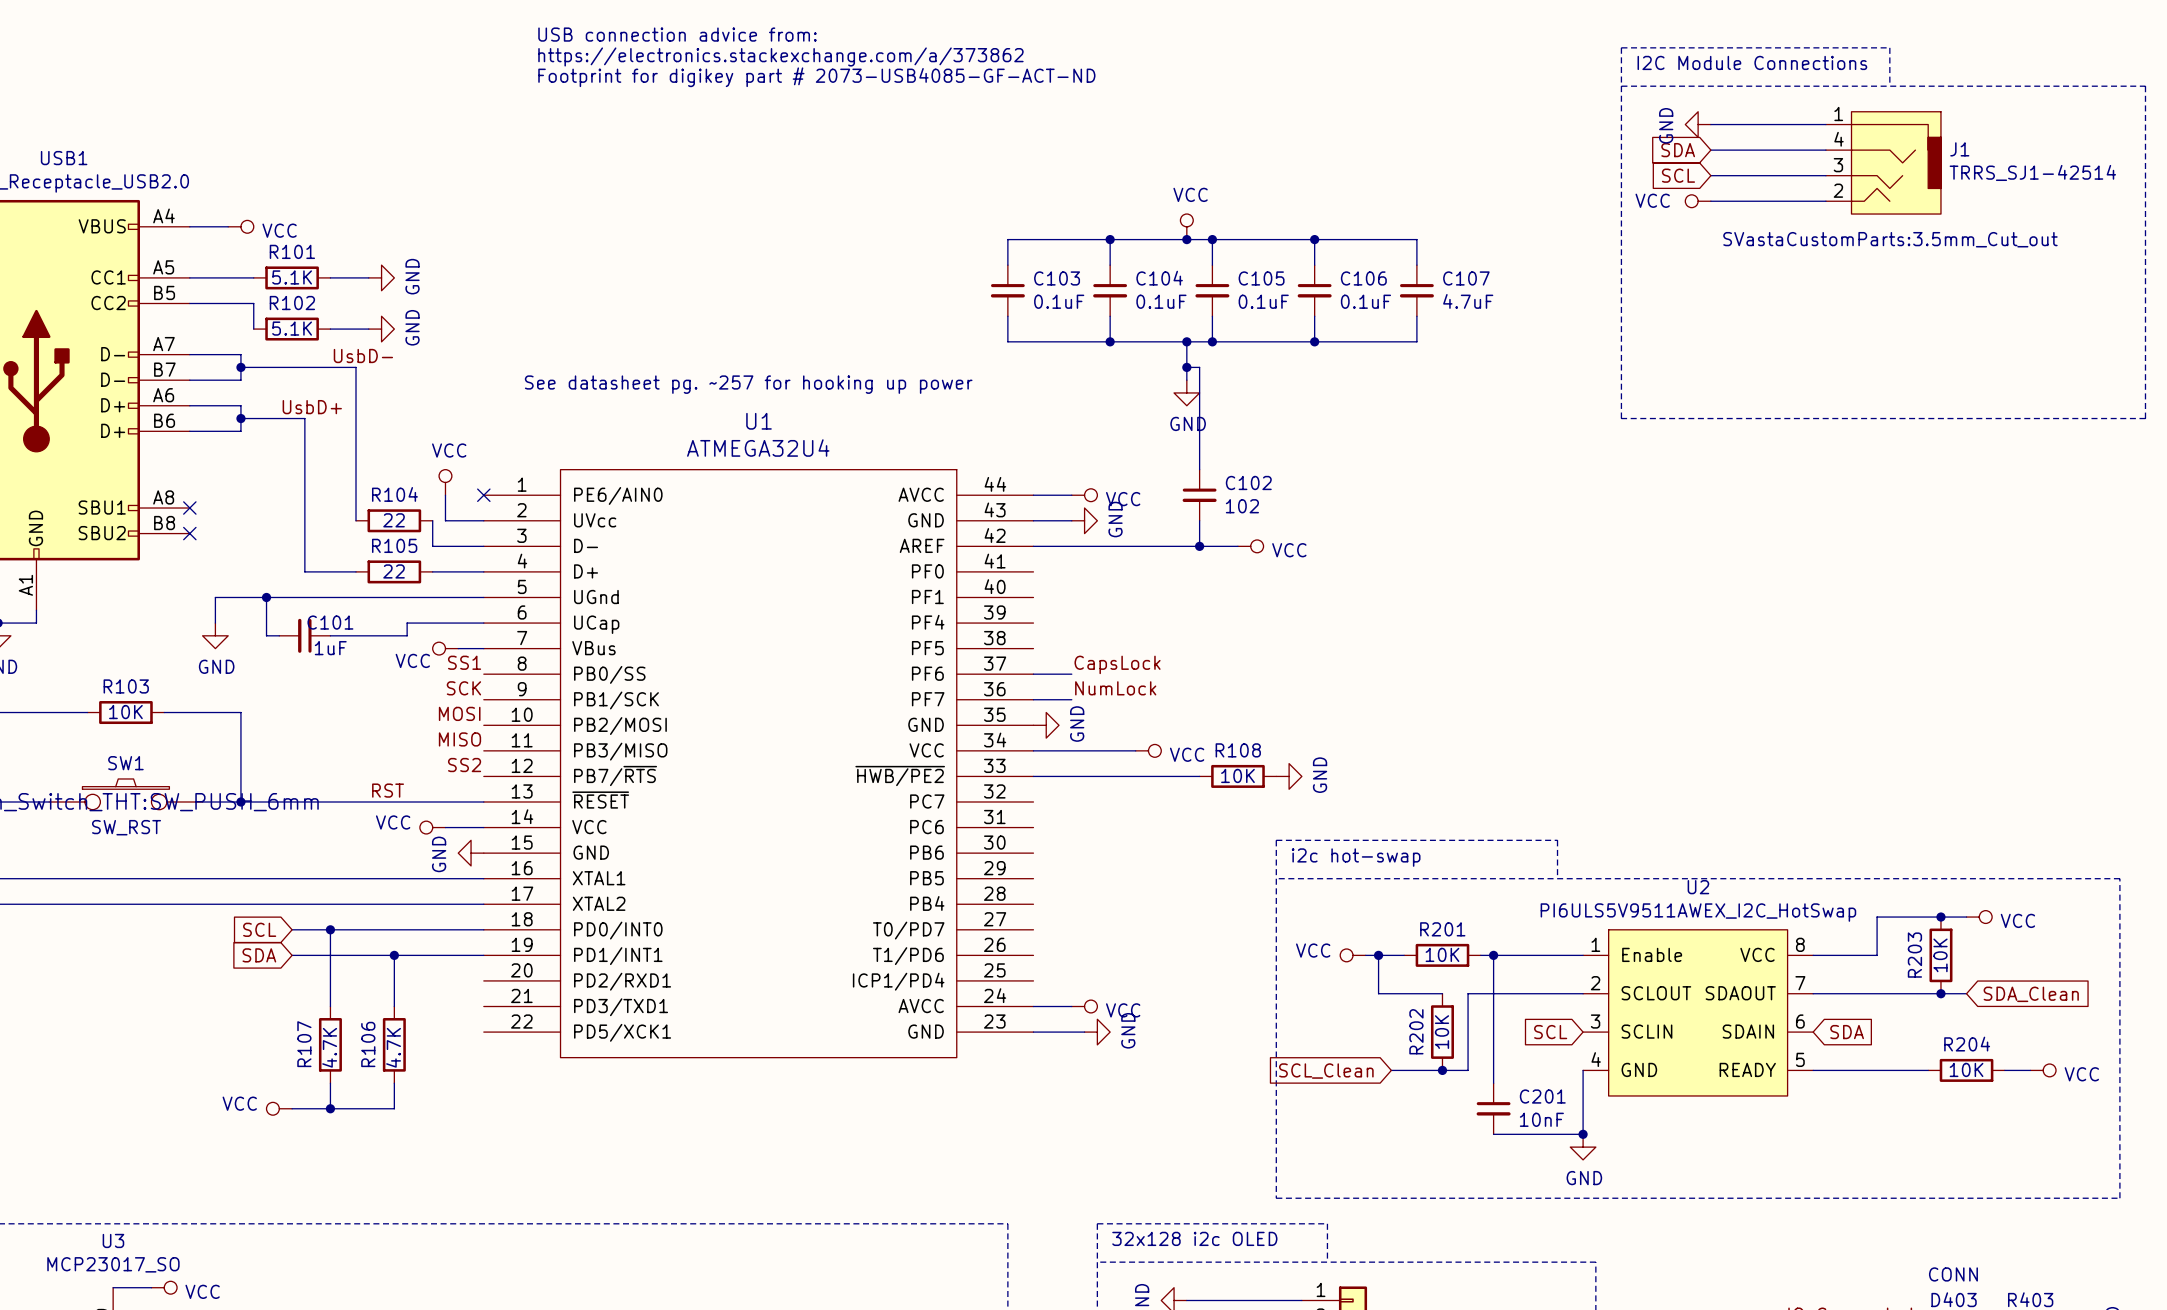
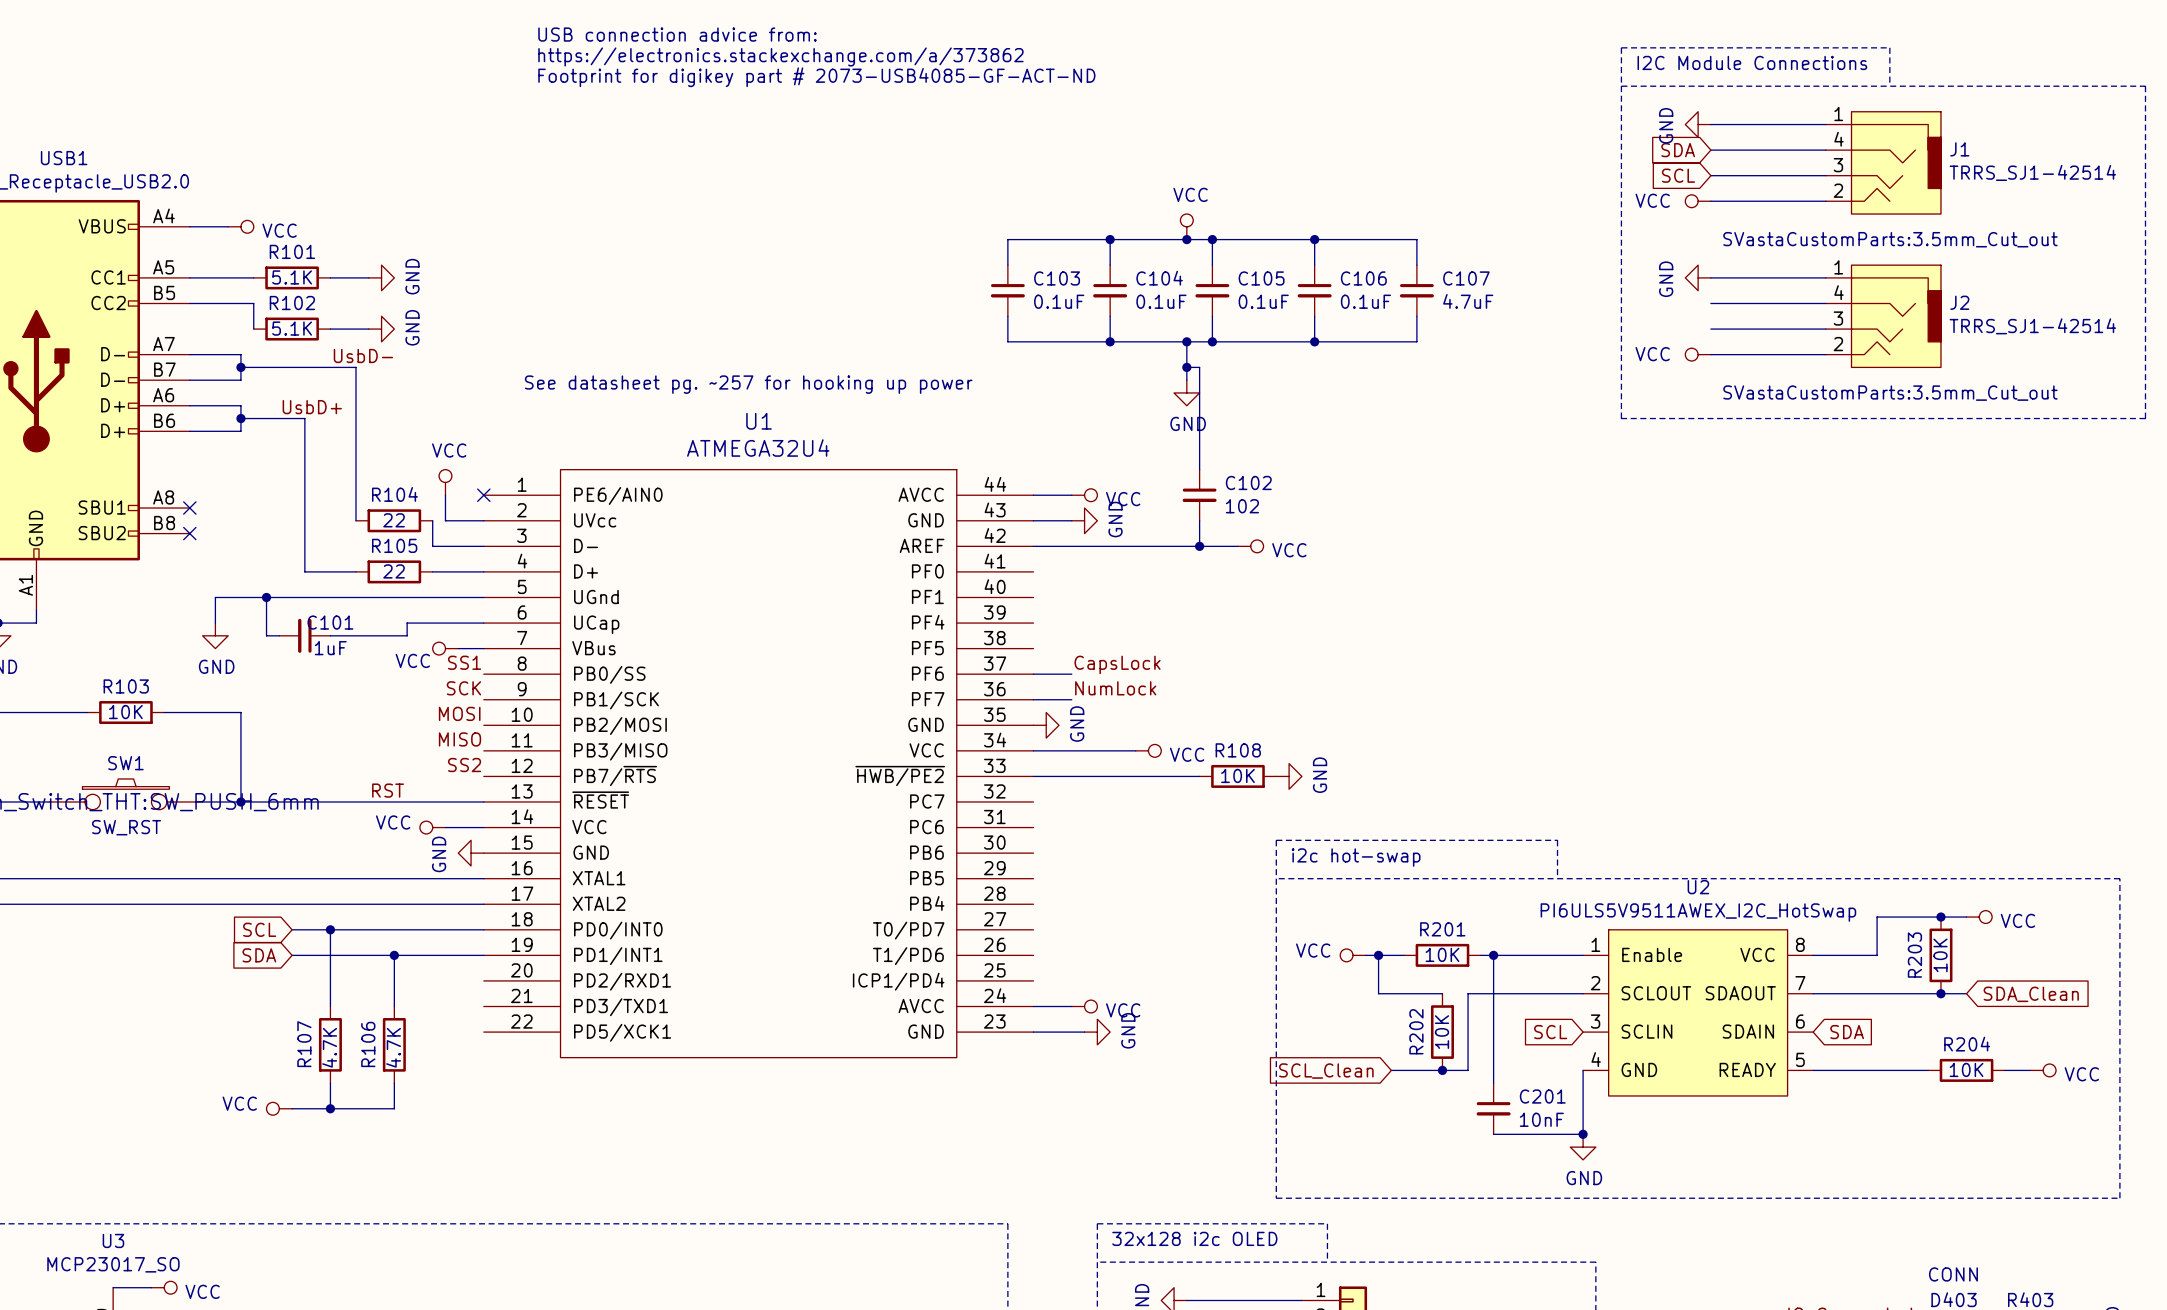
power symbol: none -> GND (1698, 277)
wire: none -> (1710, 277) (1825, 277)
wire: none -> (1710, 303) (1825, 303)
J2: none -> TRRS_SJ1-42514 (1883, 316)
wire: none -> (1710, 329) (1825, 329)
power symbol: none -> VCC (1698, 354)
wire: none -> (1710, 354) (1825, 354)

